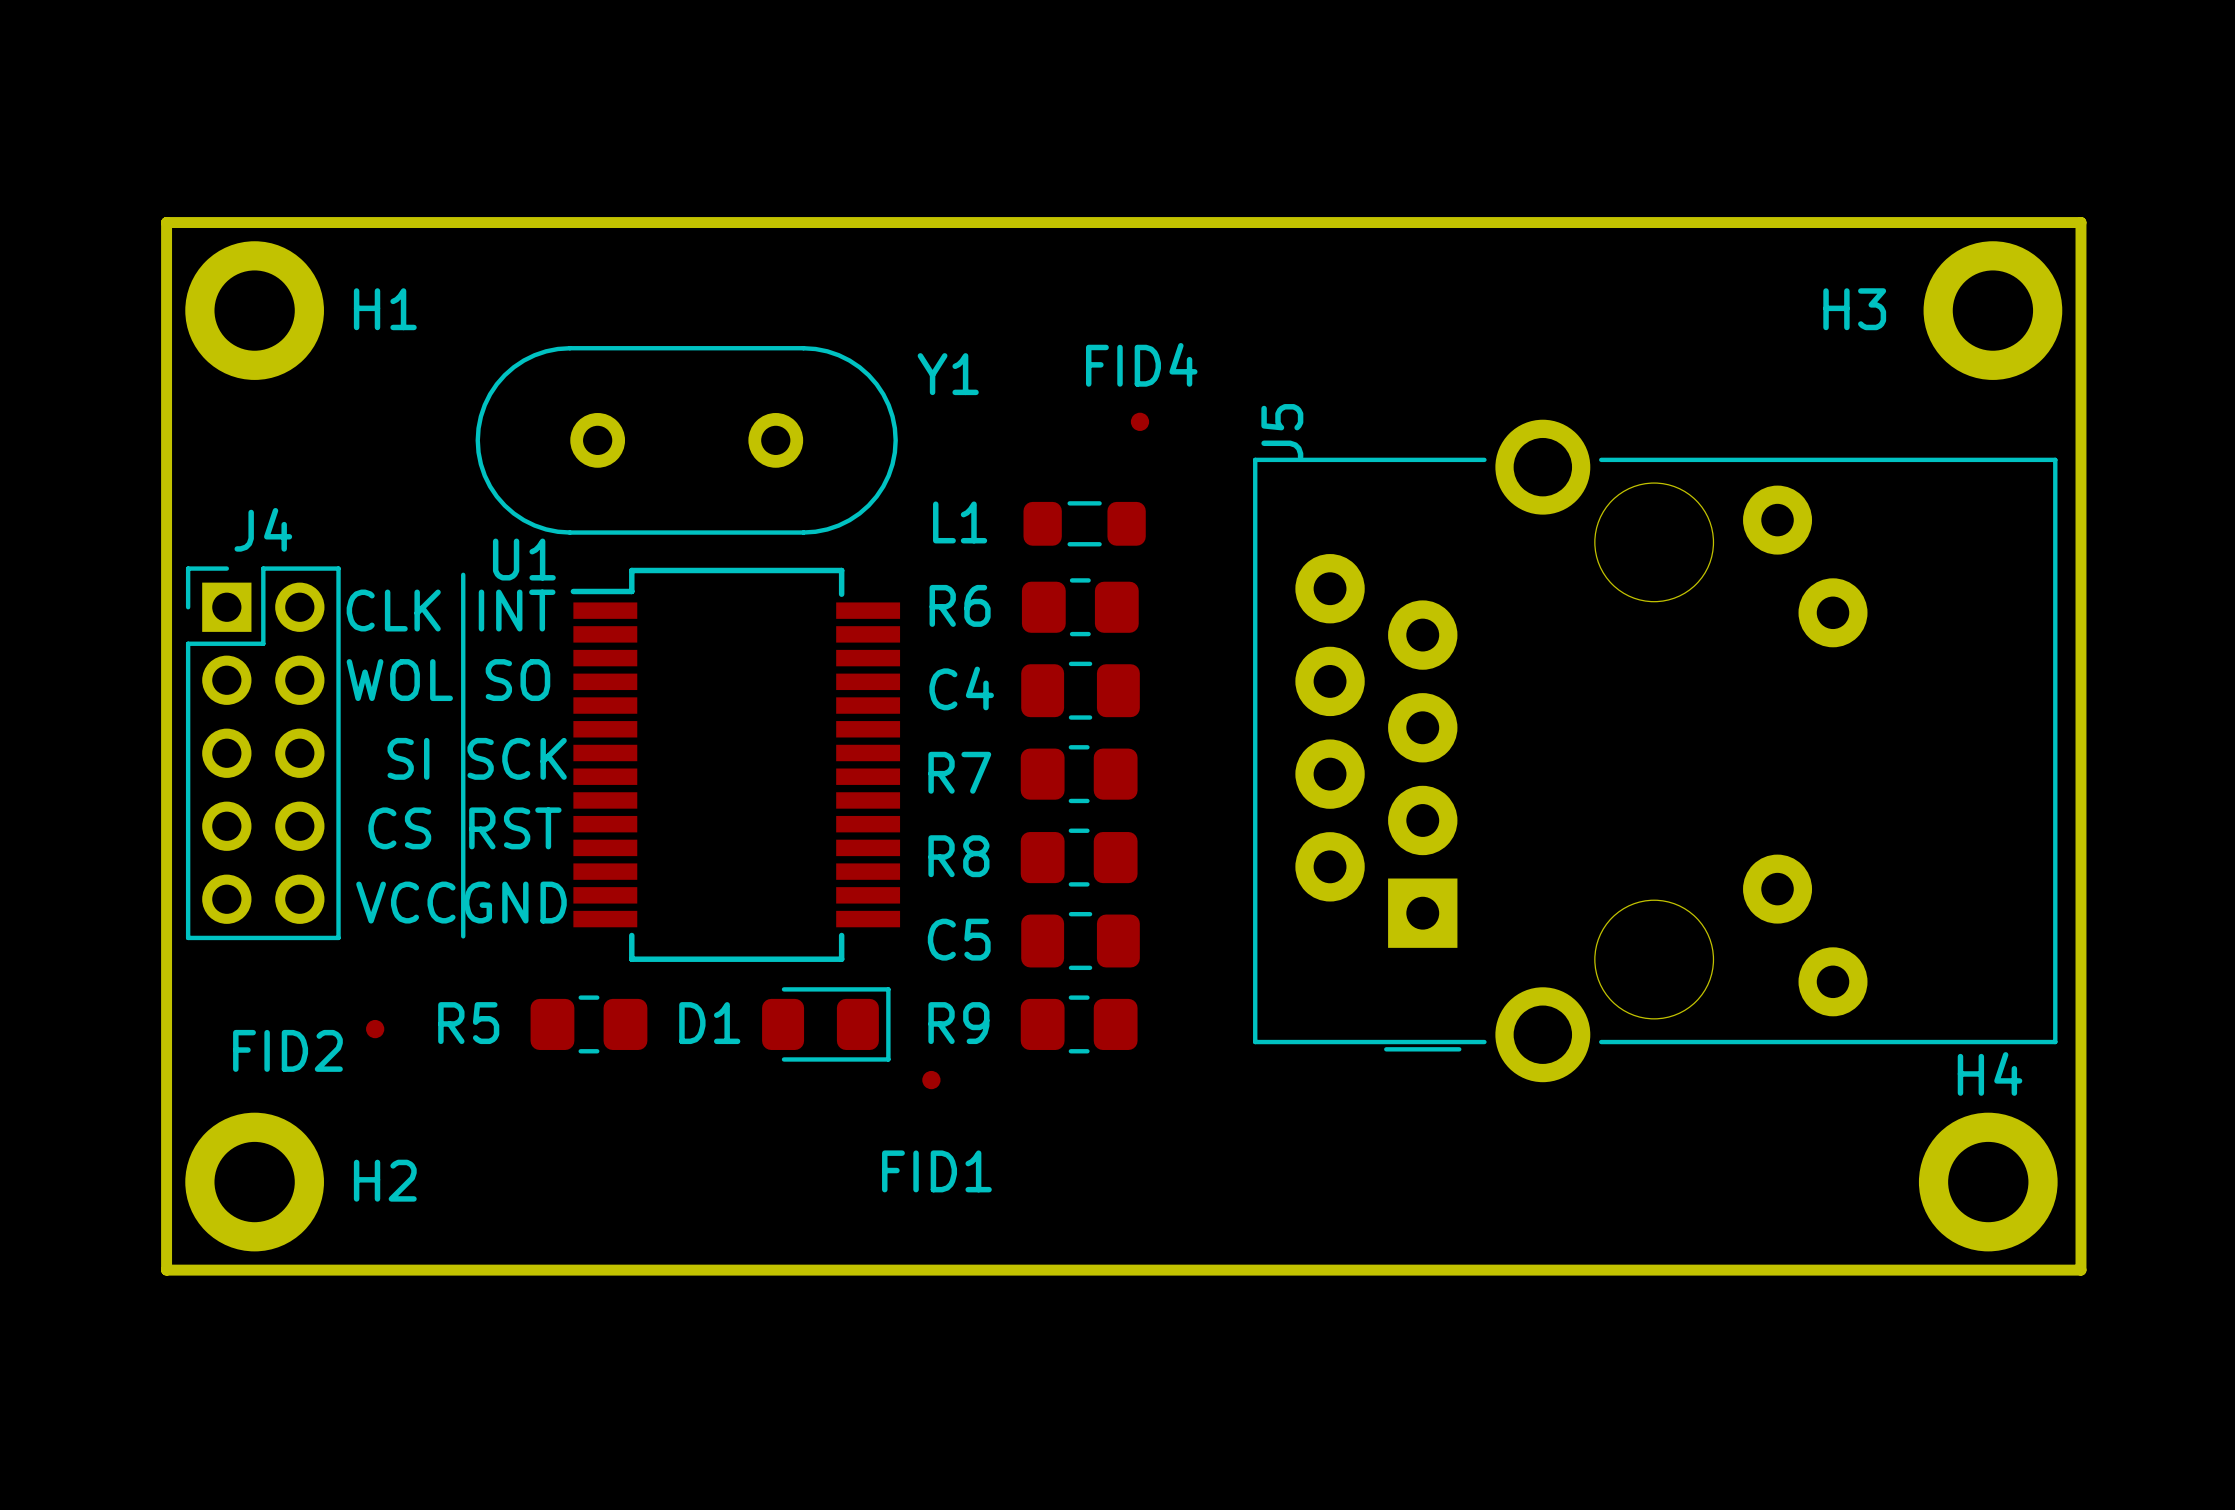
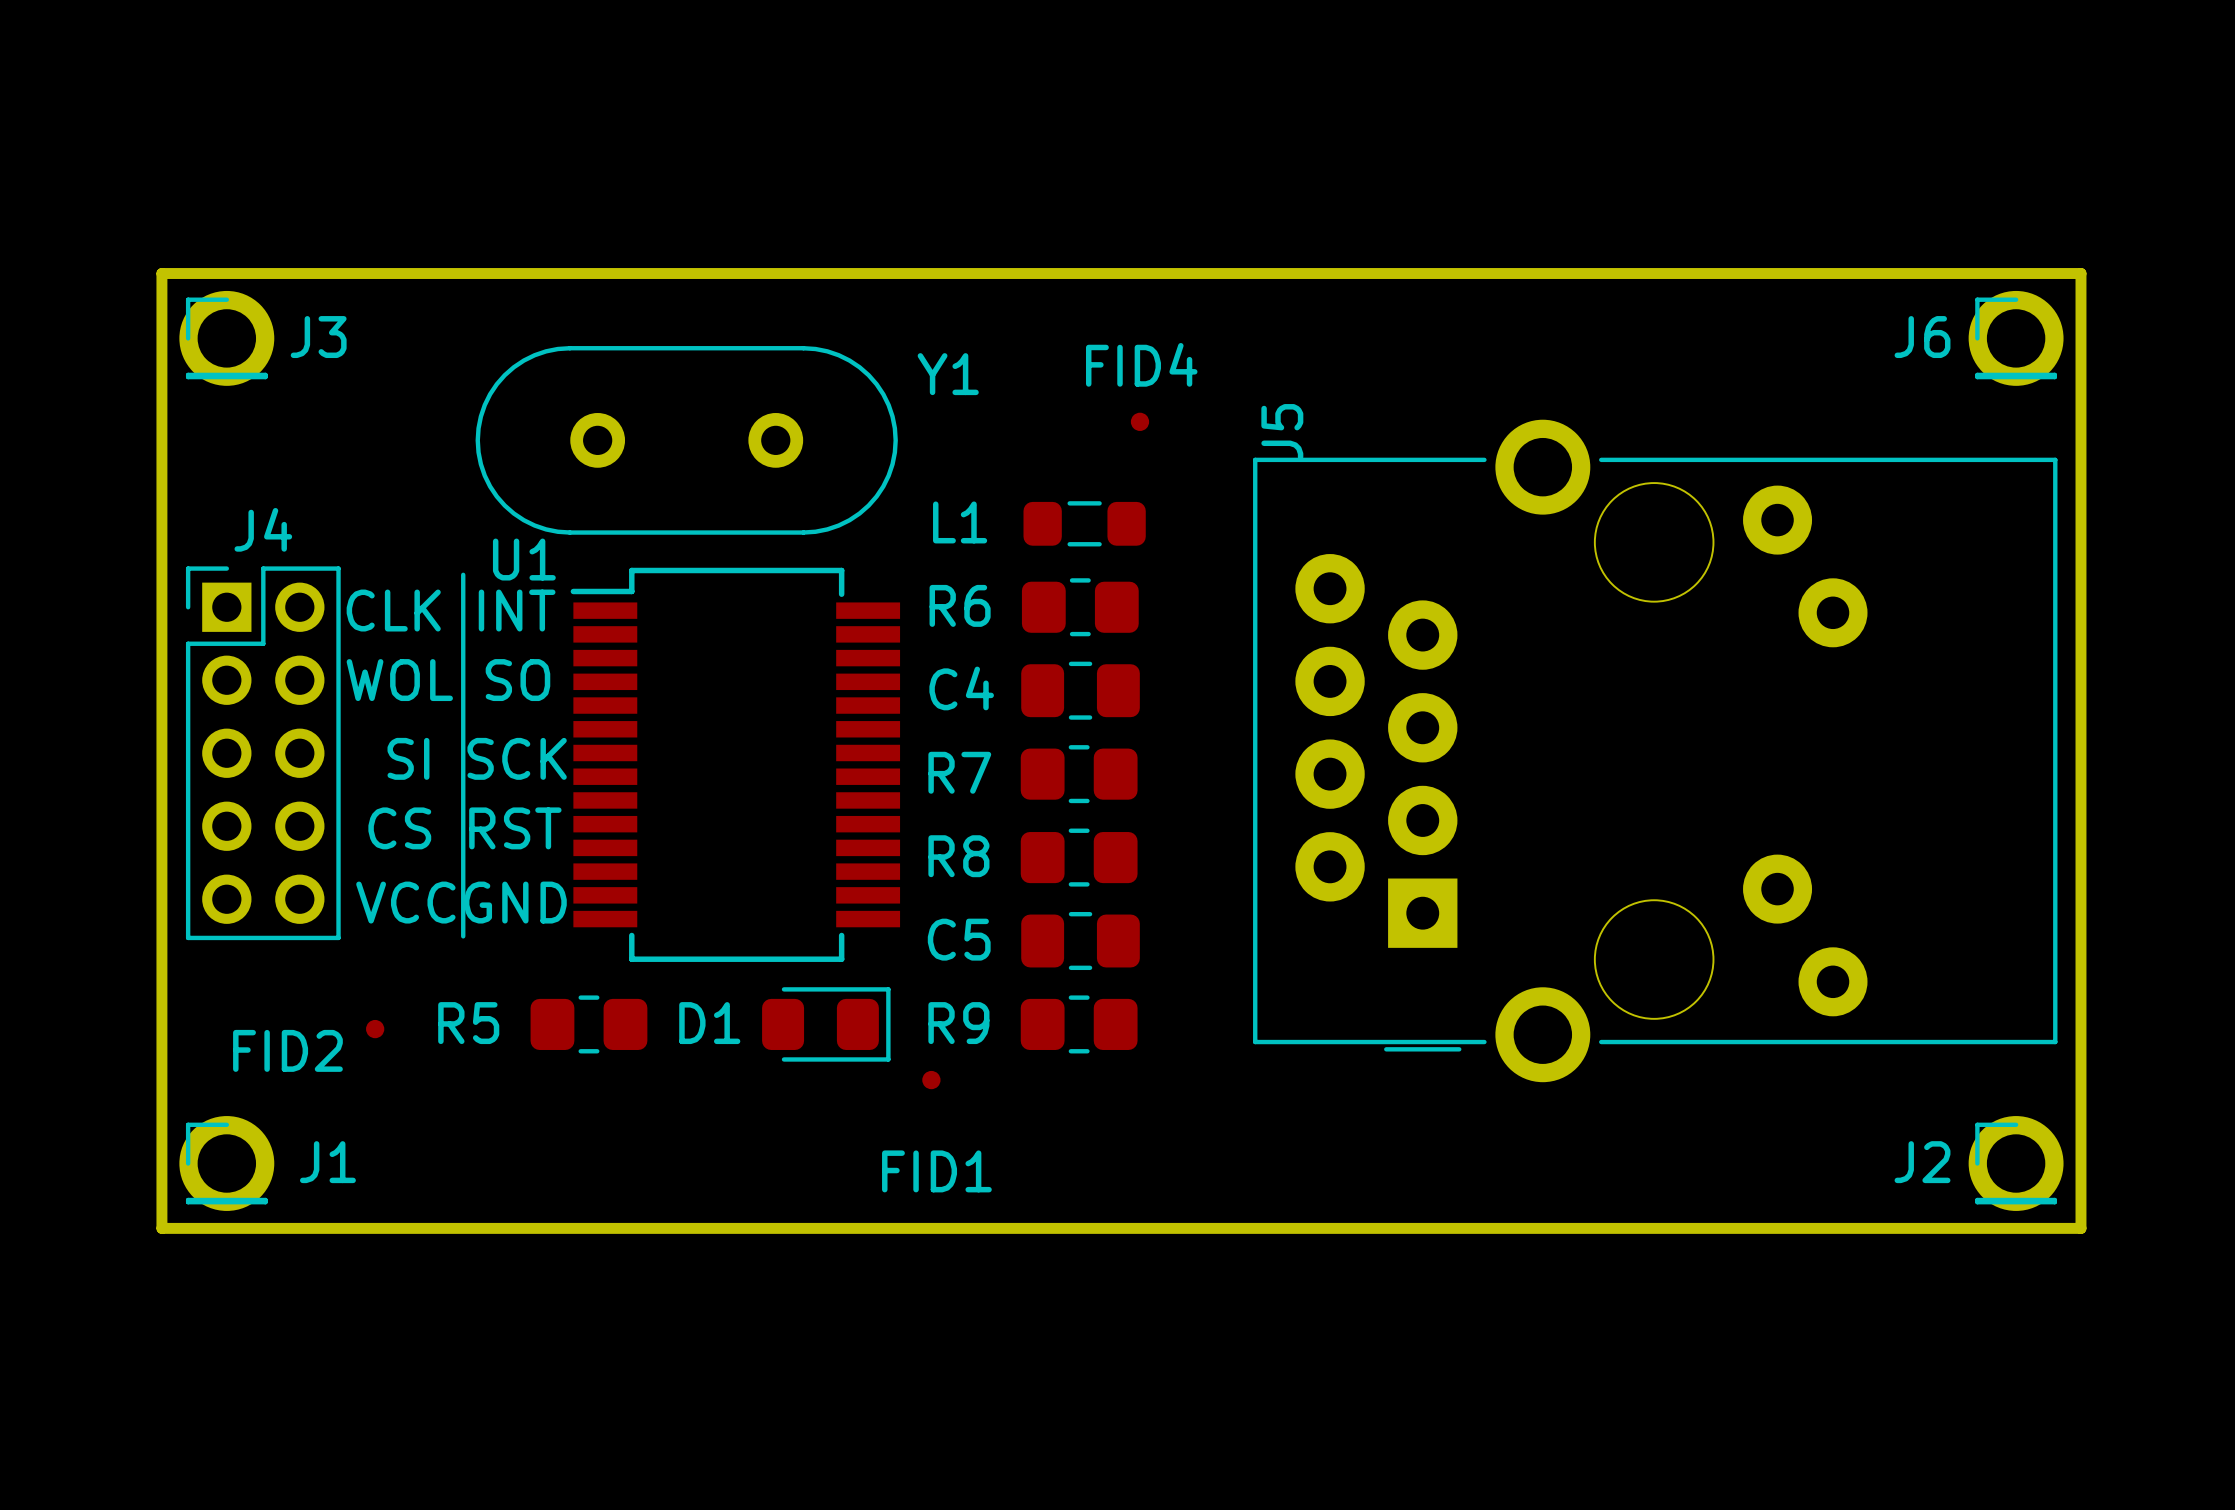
board edge: (2080, 273) (2080, 222) (166, 222) (166, 1270) (2080, 1270) (2080, 1228) -> (2080, 273) (161, 273) (161, 1228) (2080, 1228)
H1: (254, 310) -> none
H3: (1992, 310) -> none
J3: none -> (226, 338)
J6: none -> (2016, 338)
J1: none -> (226, 1163)
J2: none -> (2016, 1163)
H2: (254, 1182) -> none
H4: (1988, 1182) -> none

